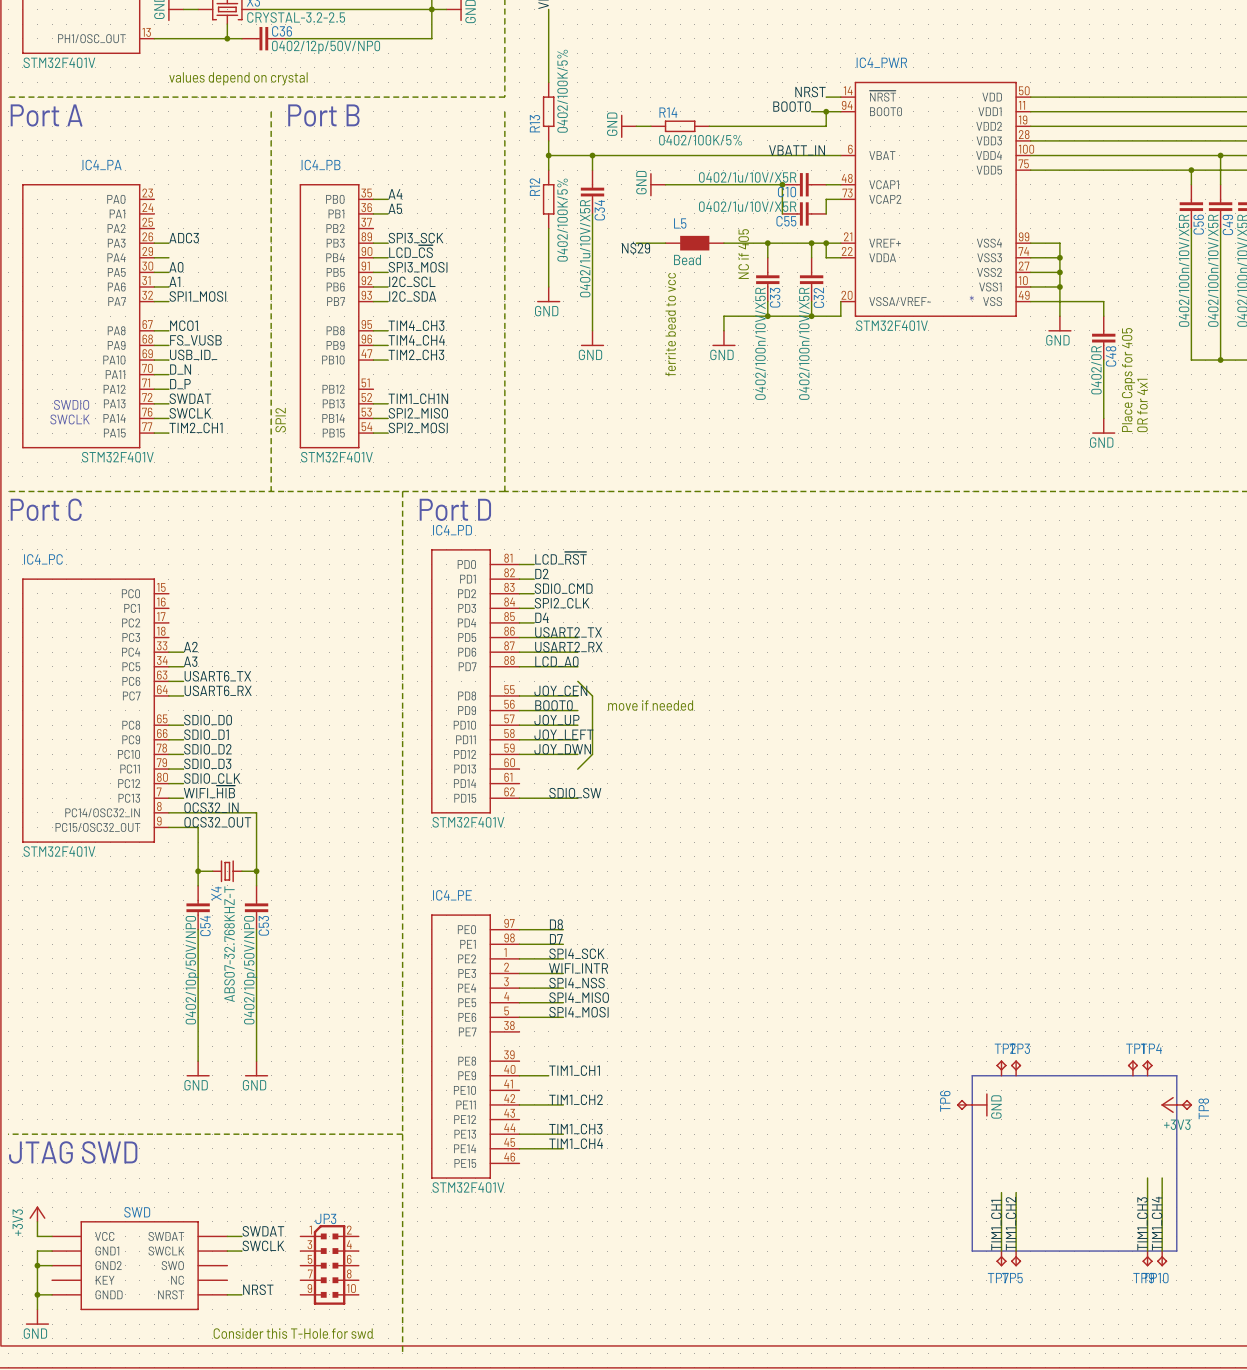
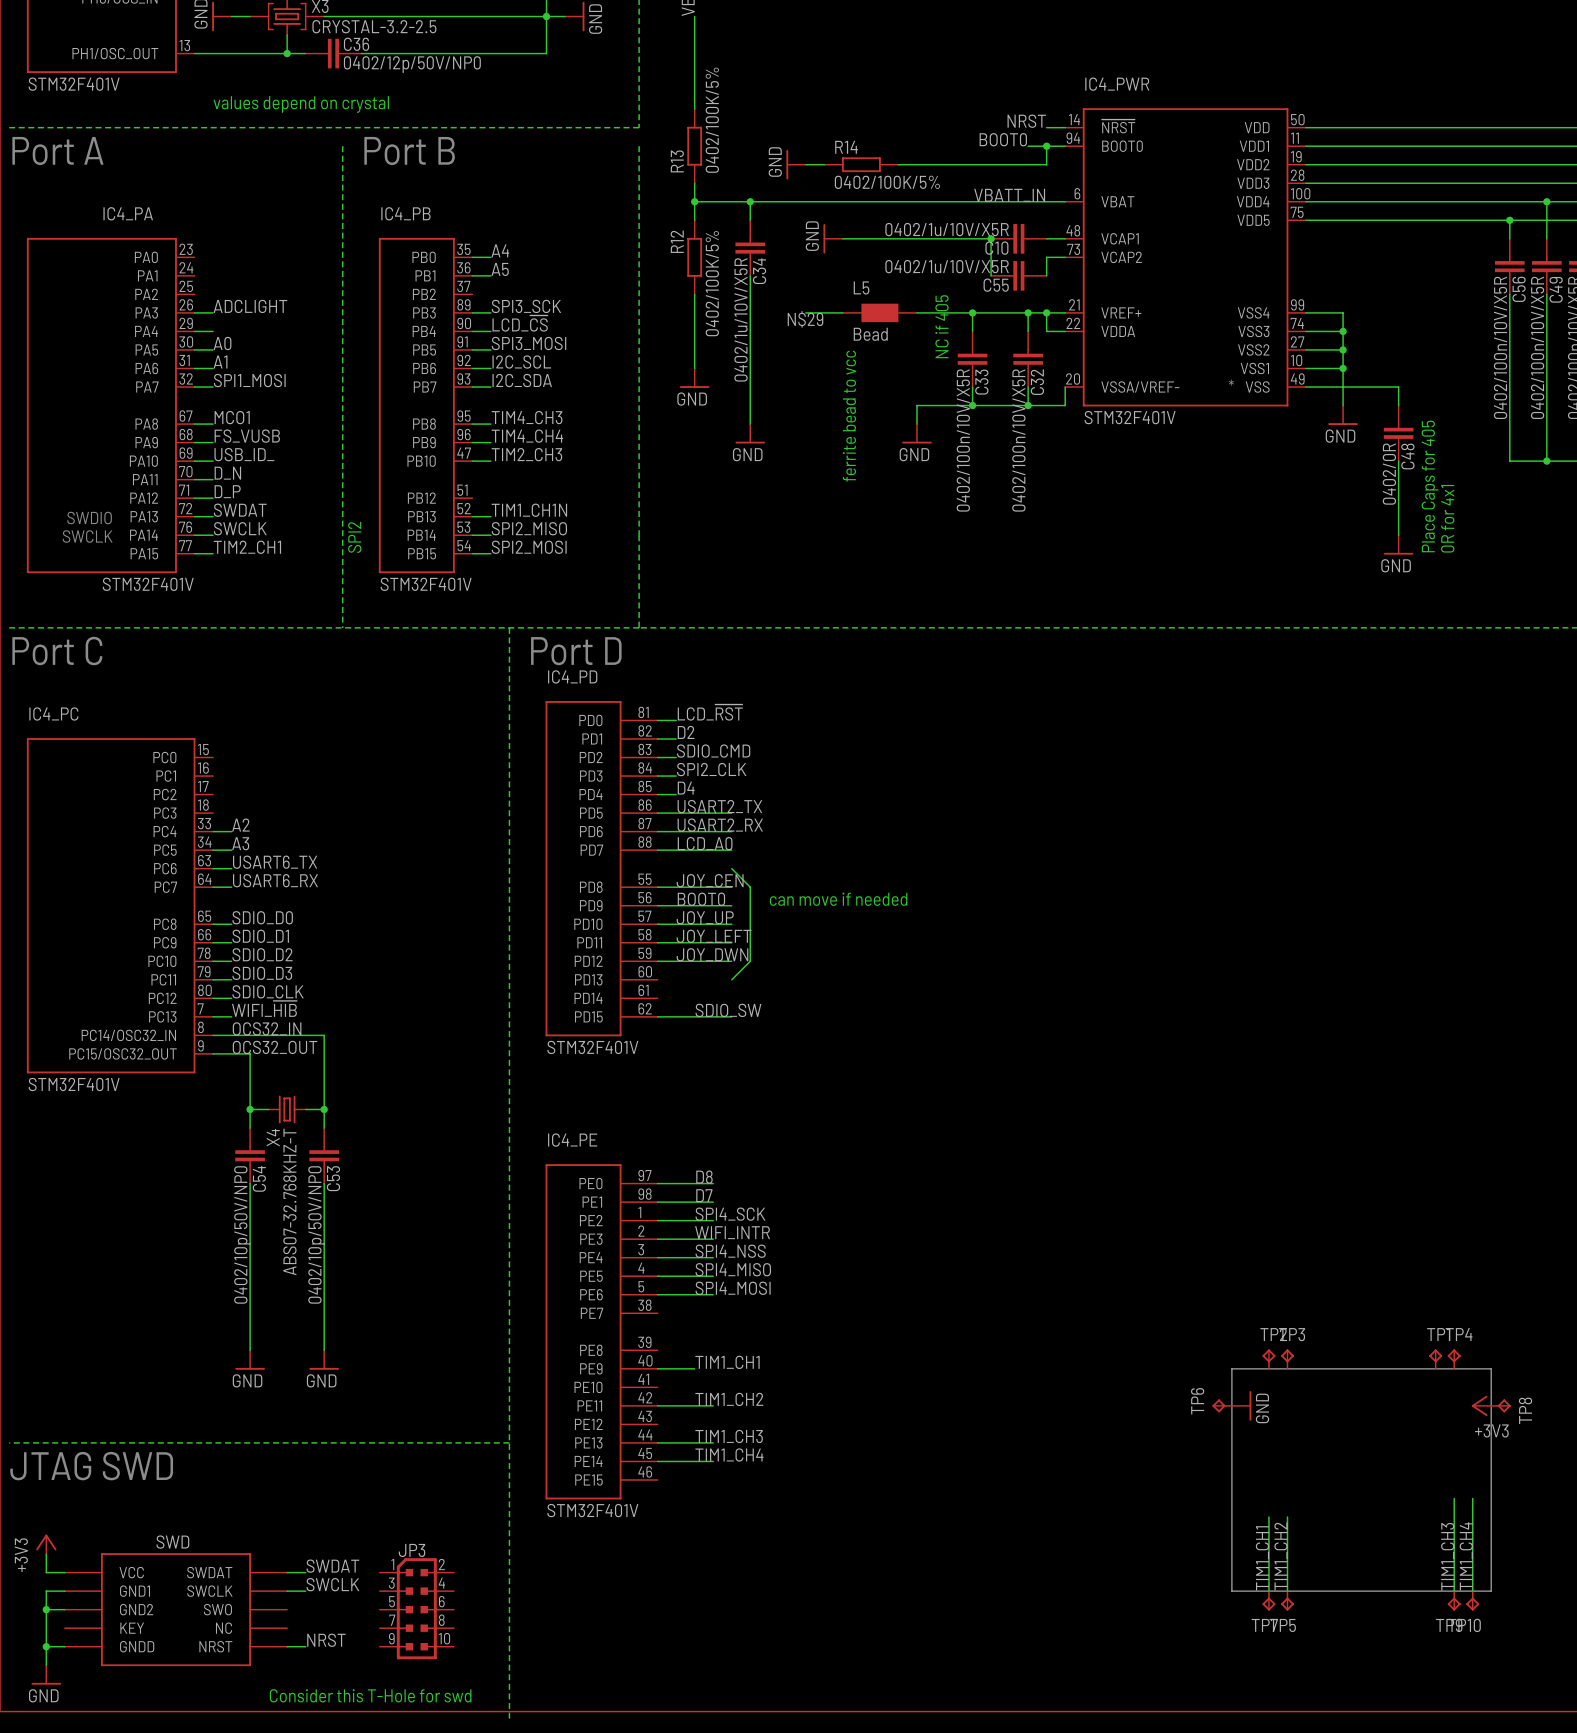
label: ADC3 (184, 238) -> ADCLIGHT (250, 306)
text: move if needed (650, 705) -> can move if needed (838, 899)

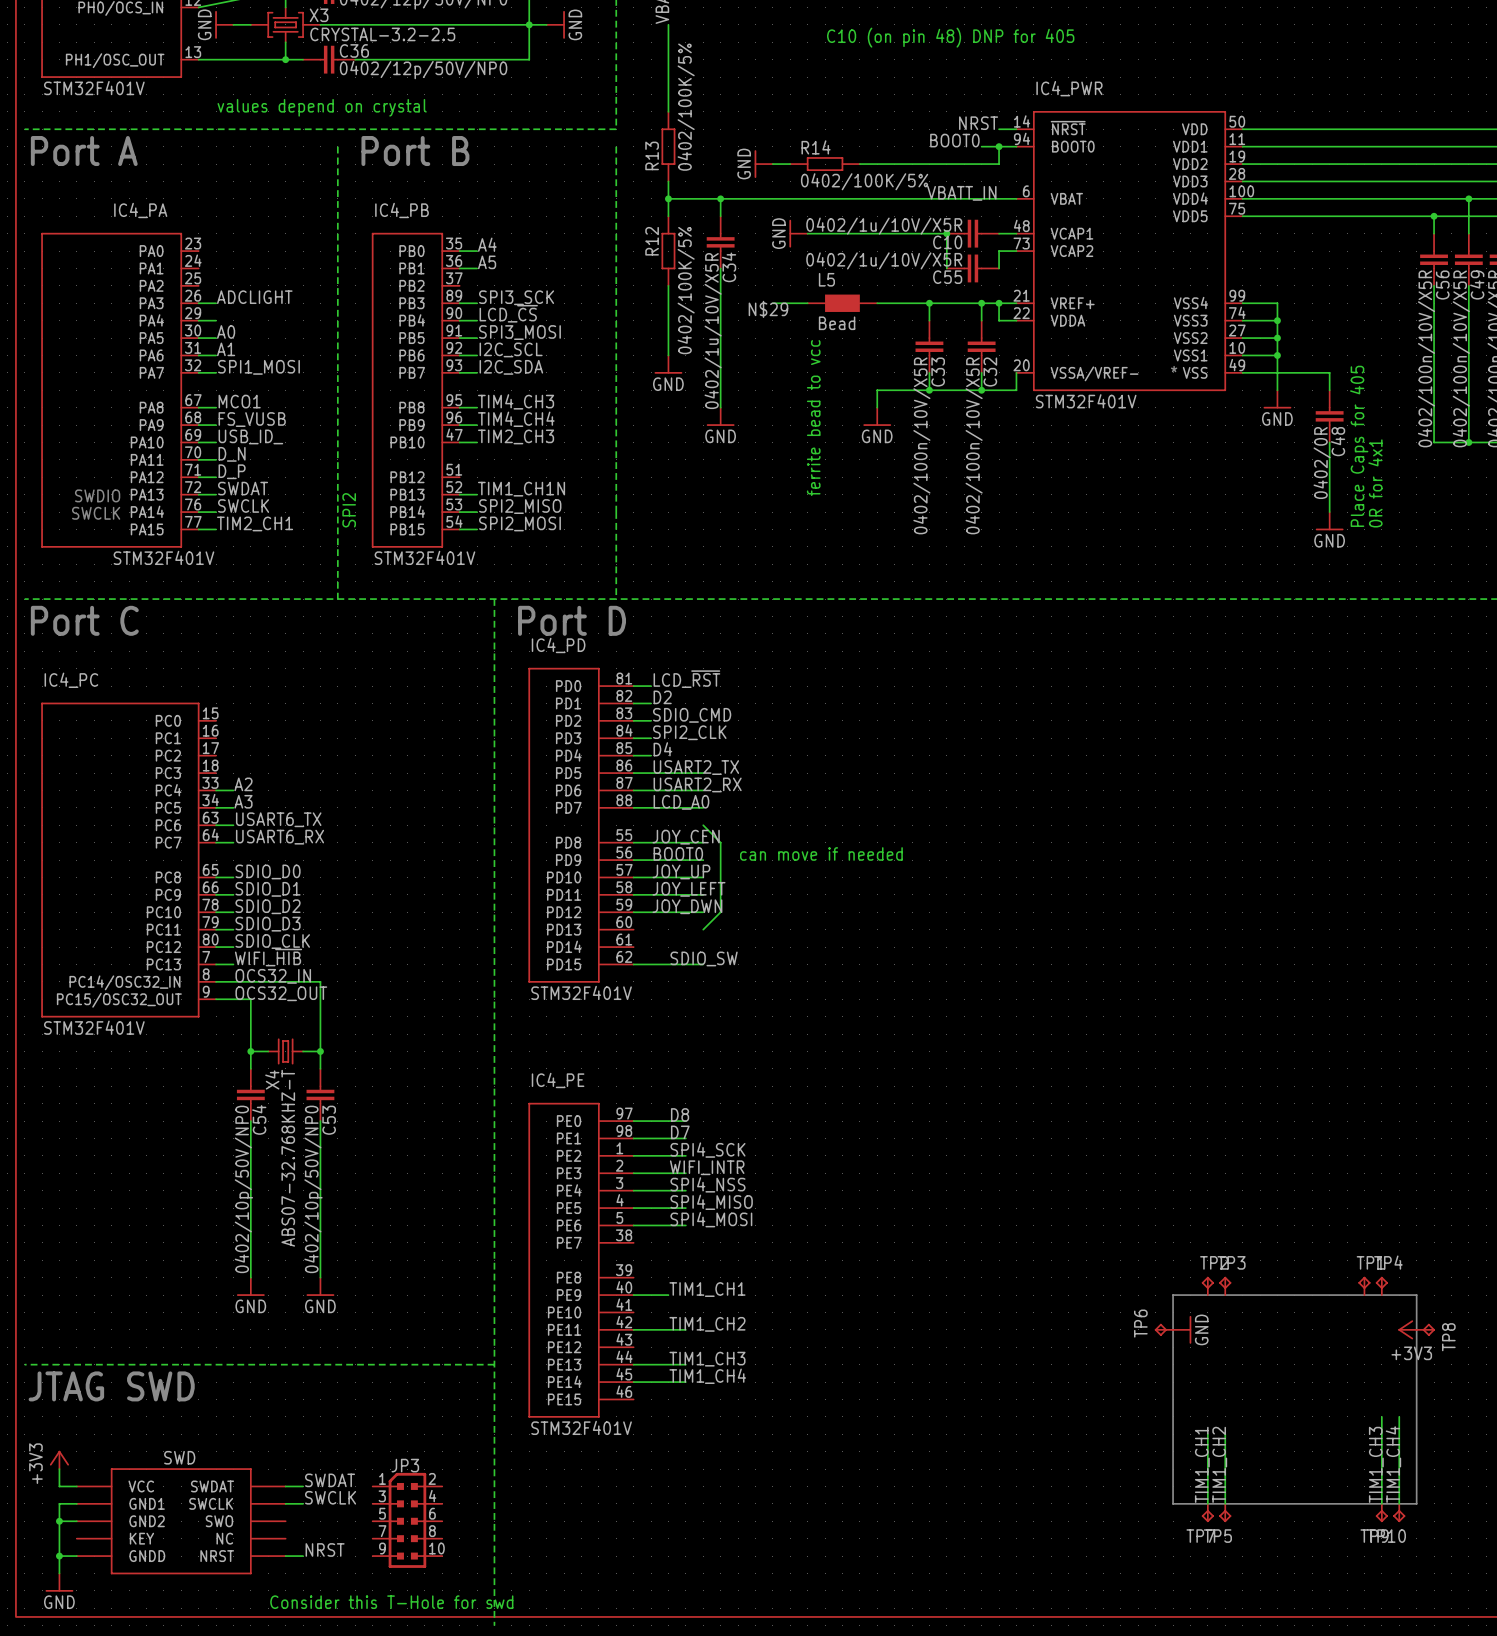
text: none -> C10 (on pin 48) DNP for 405 (950, 37)
text: NC if 405 (941, 326) -> none

